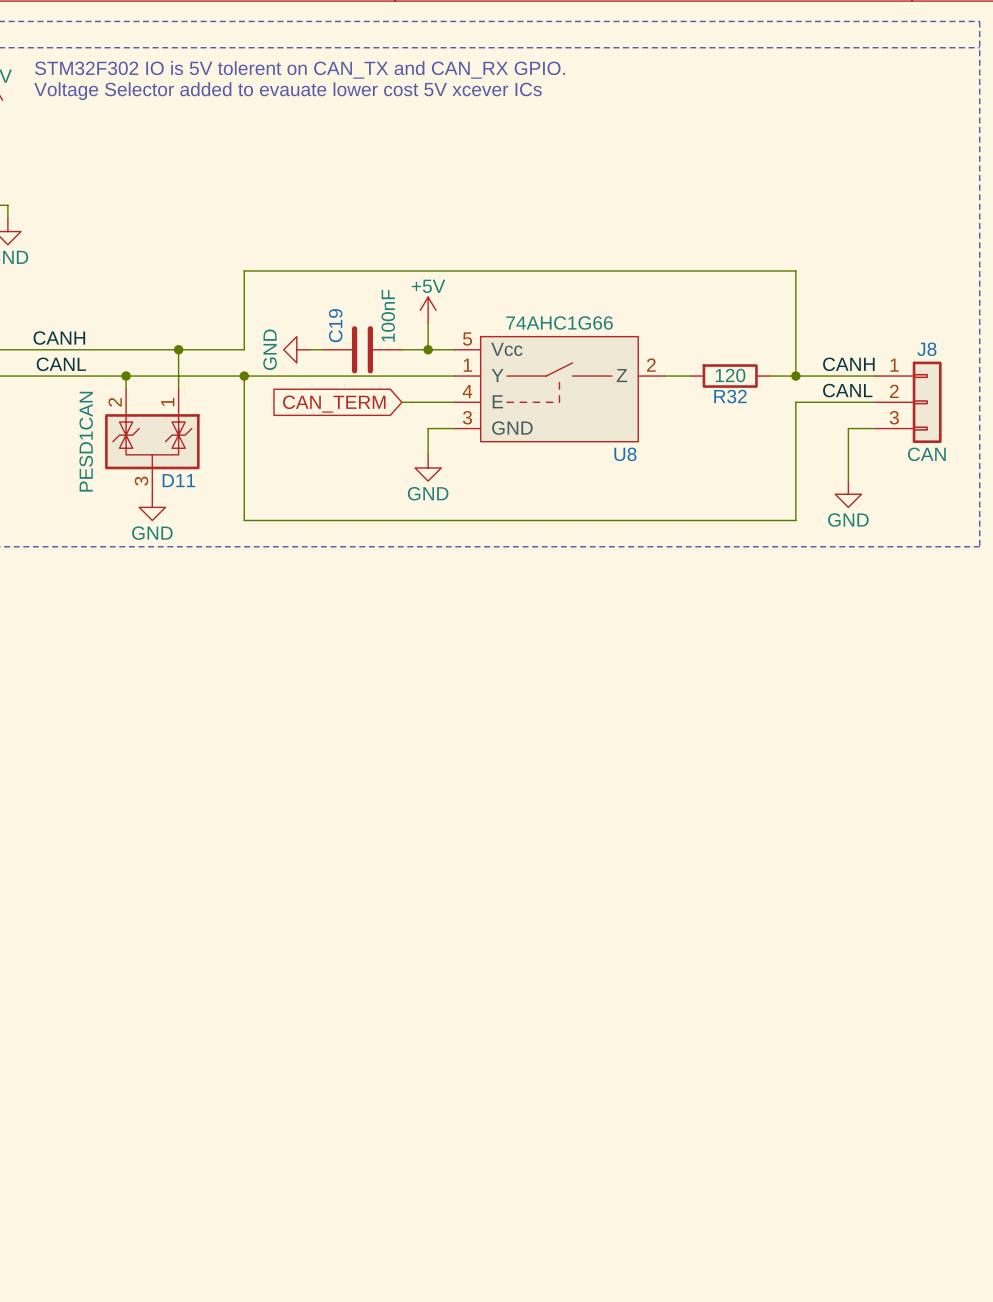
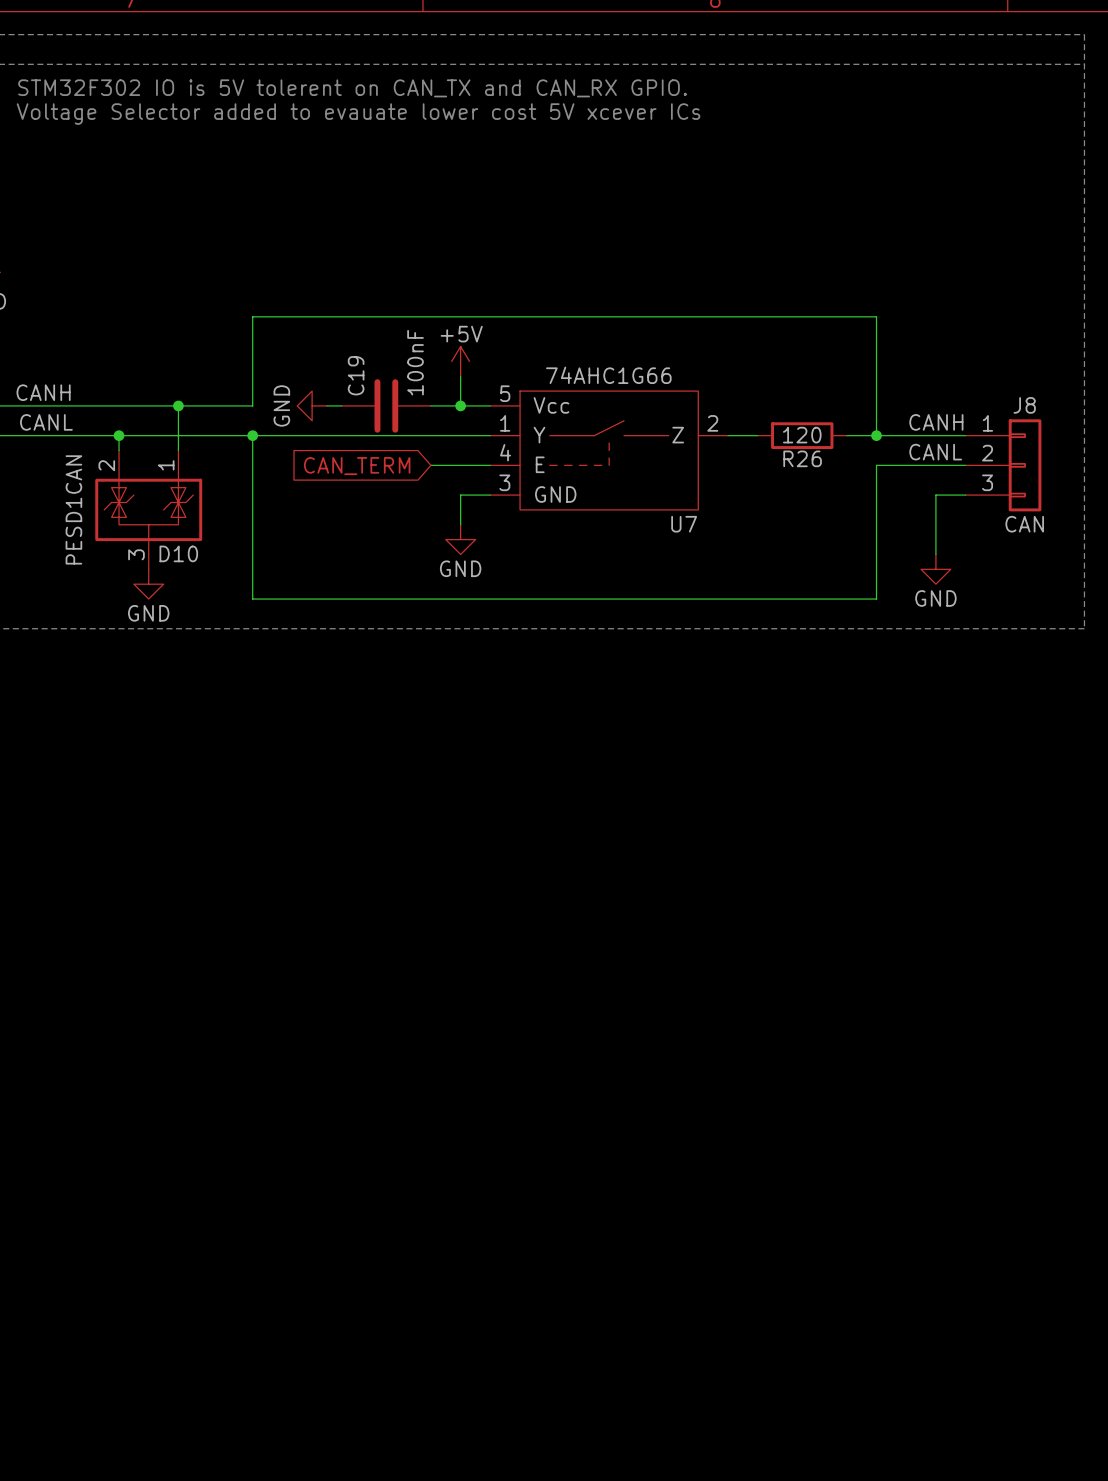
R32 name: R32 (730, 396) -> R26 (802, 458)
U8 name: U8 (625, 454) -> U7 (684, 524)
D11 name: D11 (178, 480) -> D10 (178, 553)

